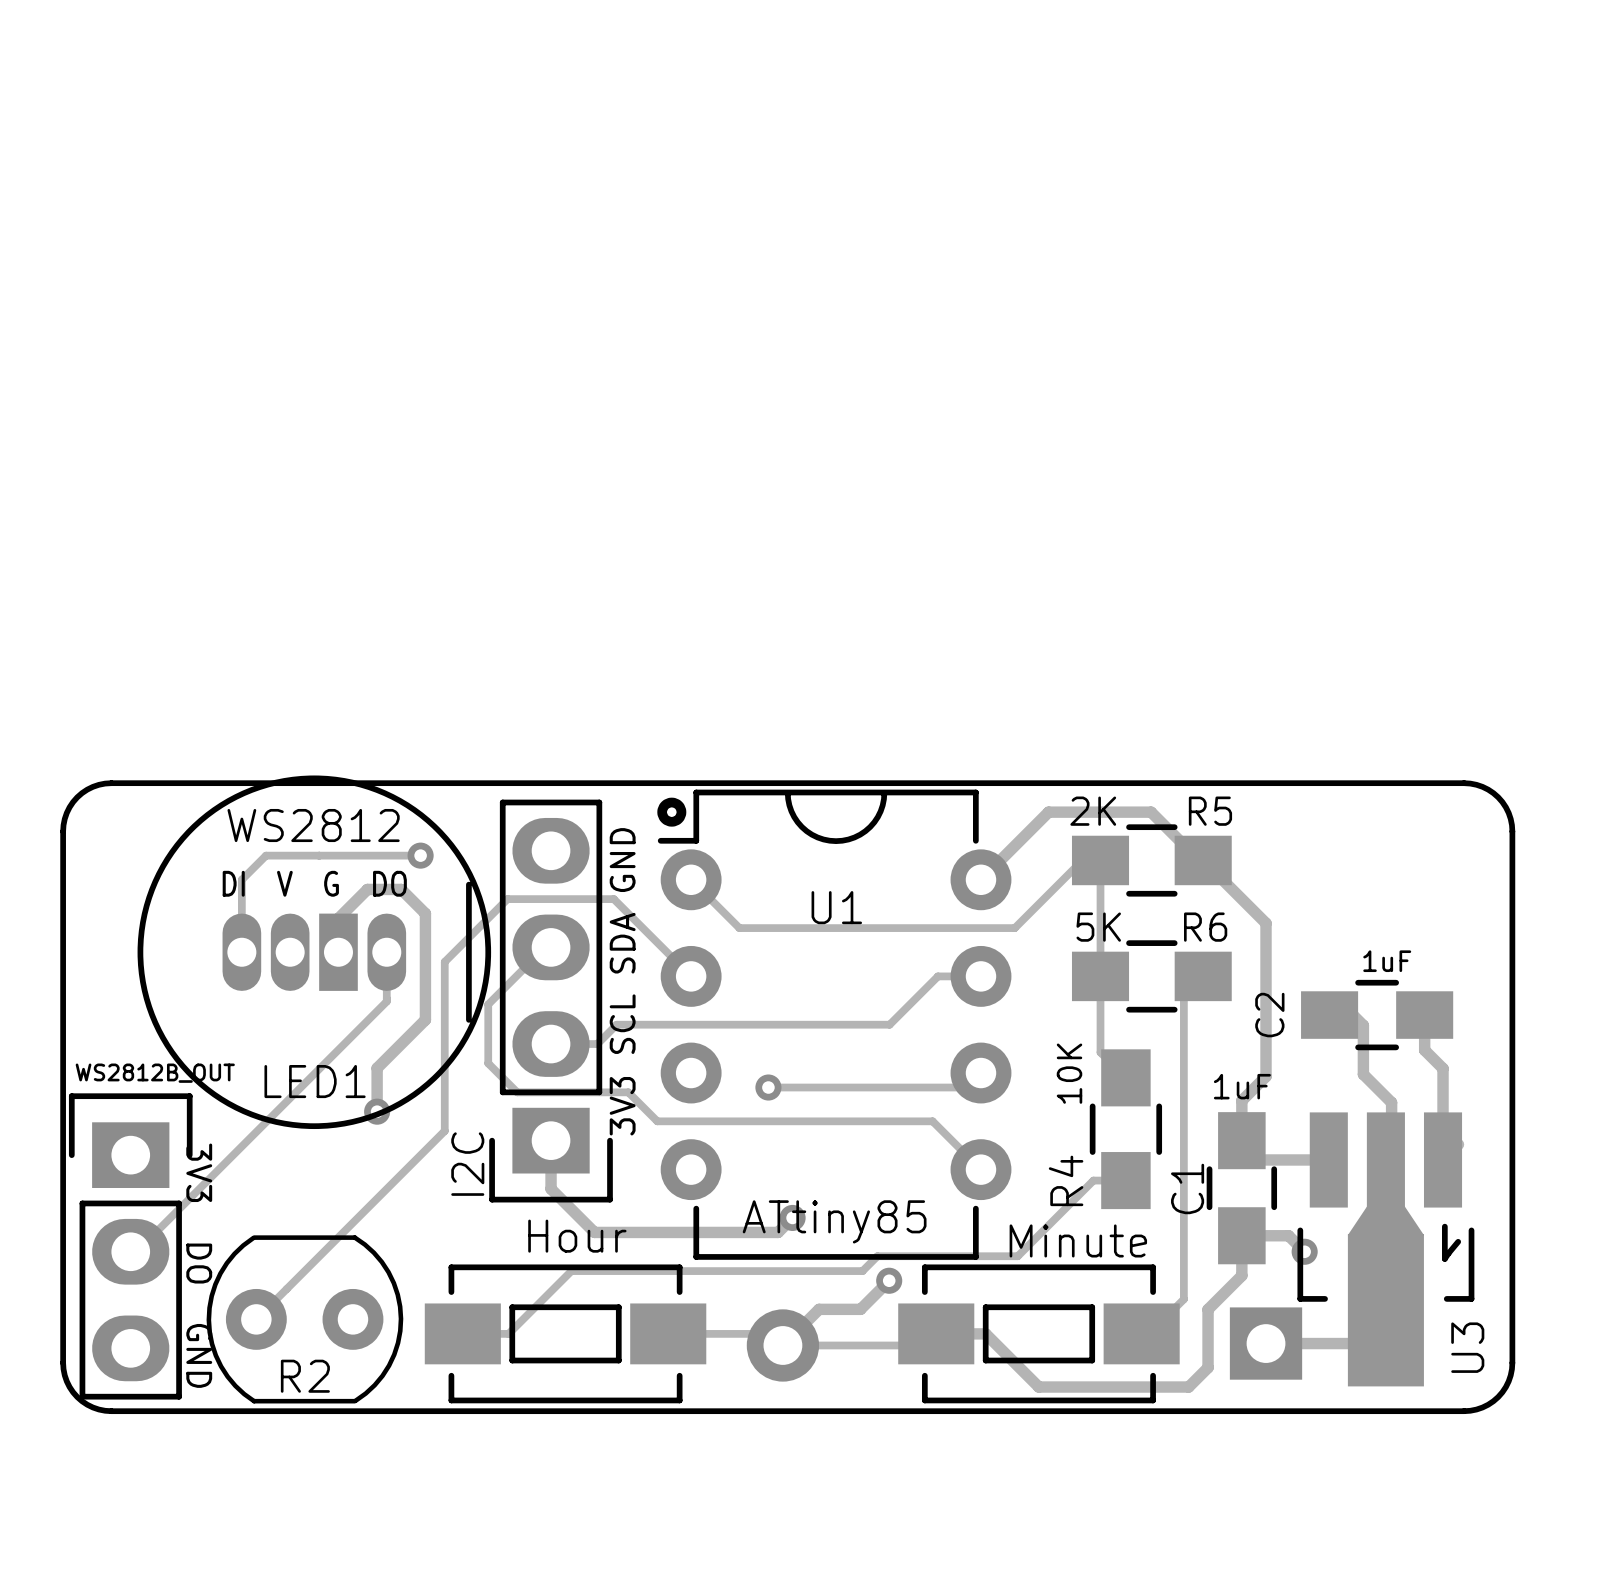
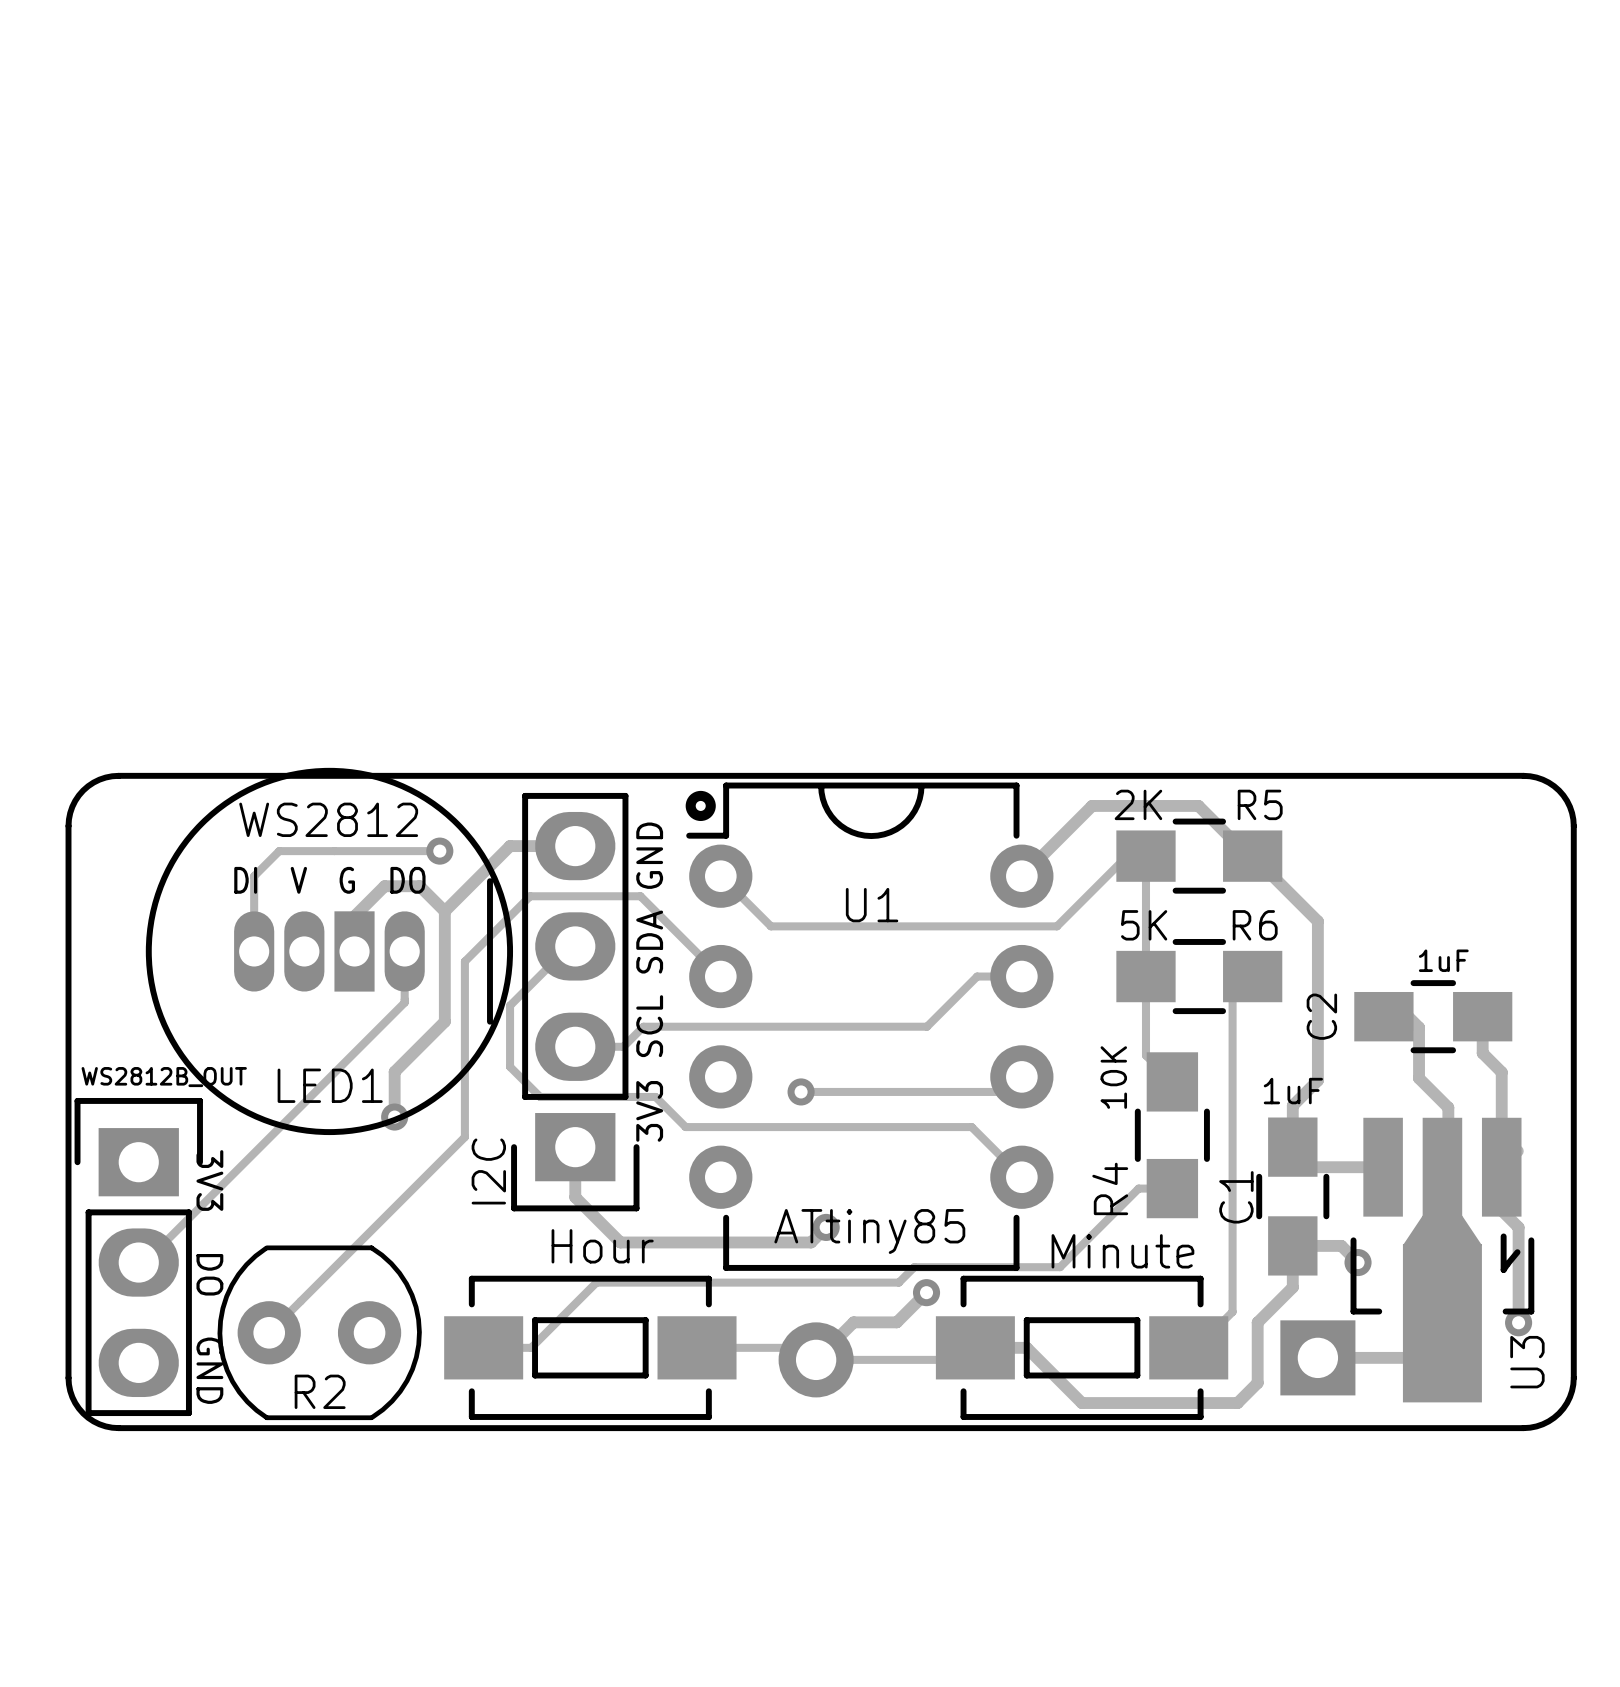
track: none -> (575, 846) (510, 846) (444, 911)
track: none -> (1501, 1167) (1501, 1210) (1518, 1227) (1518, 1322)
via: none -> (1518, 1322)

